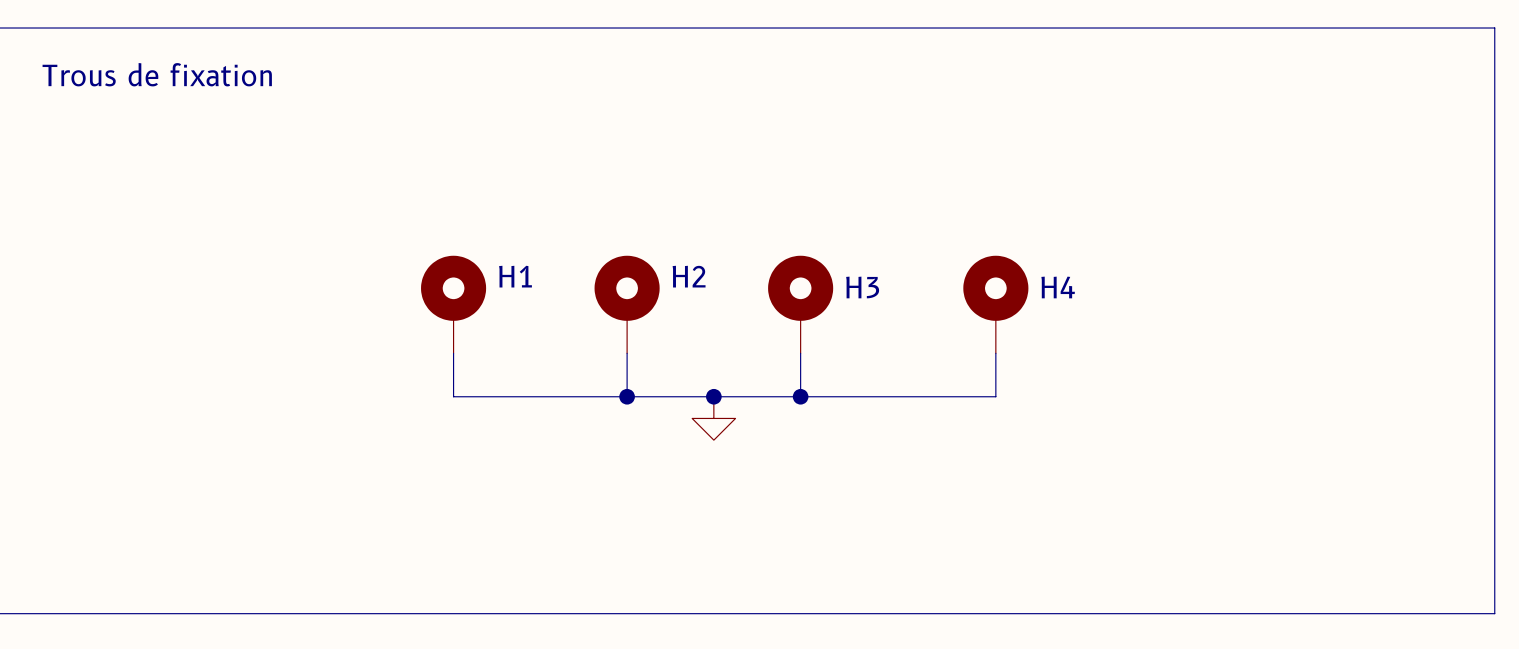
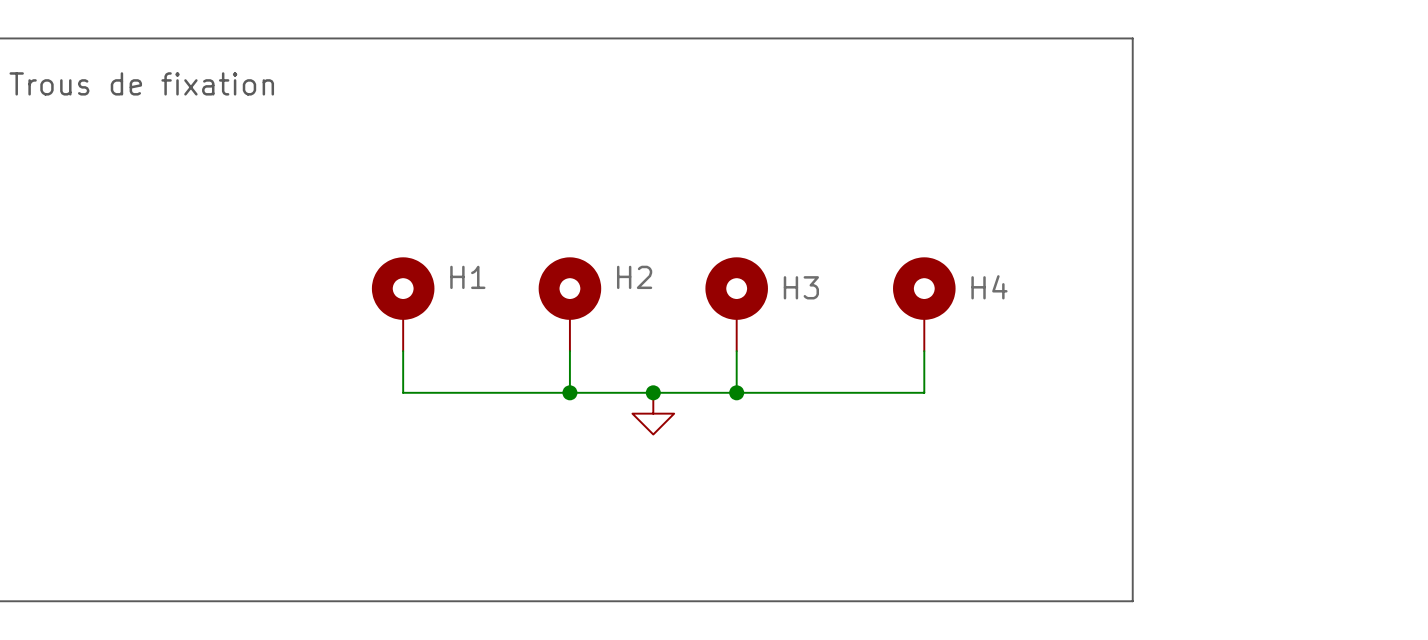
line: (1212, 28) (1494, 28) (1494, 613) (1212, 613) -> (1132, 38) (1132, 601)

